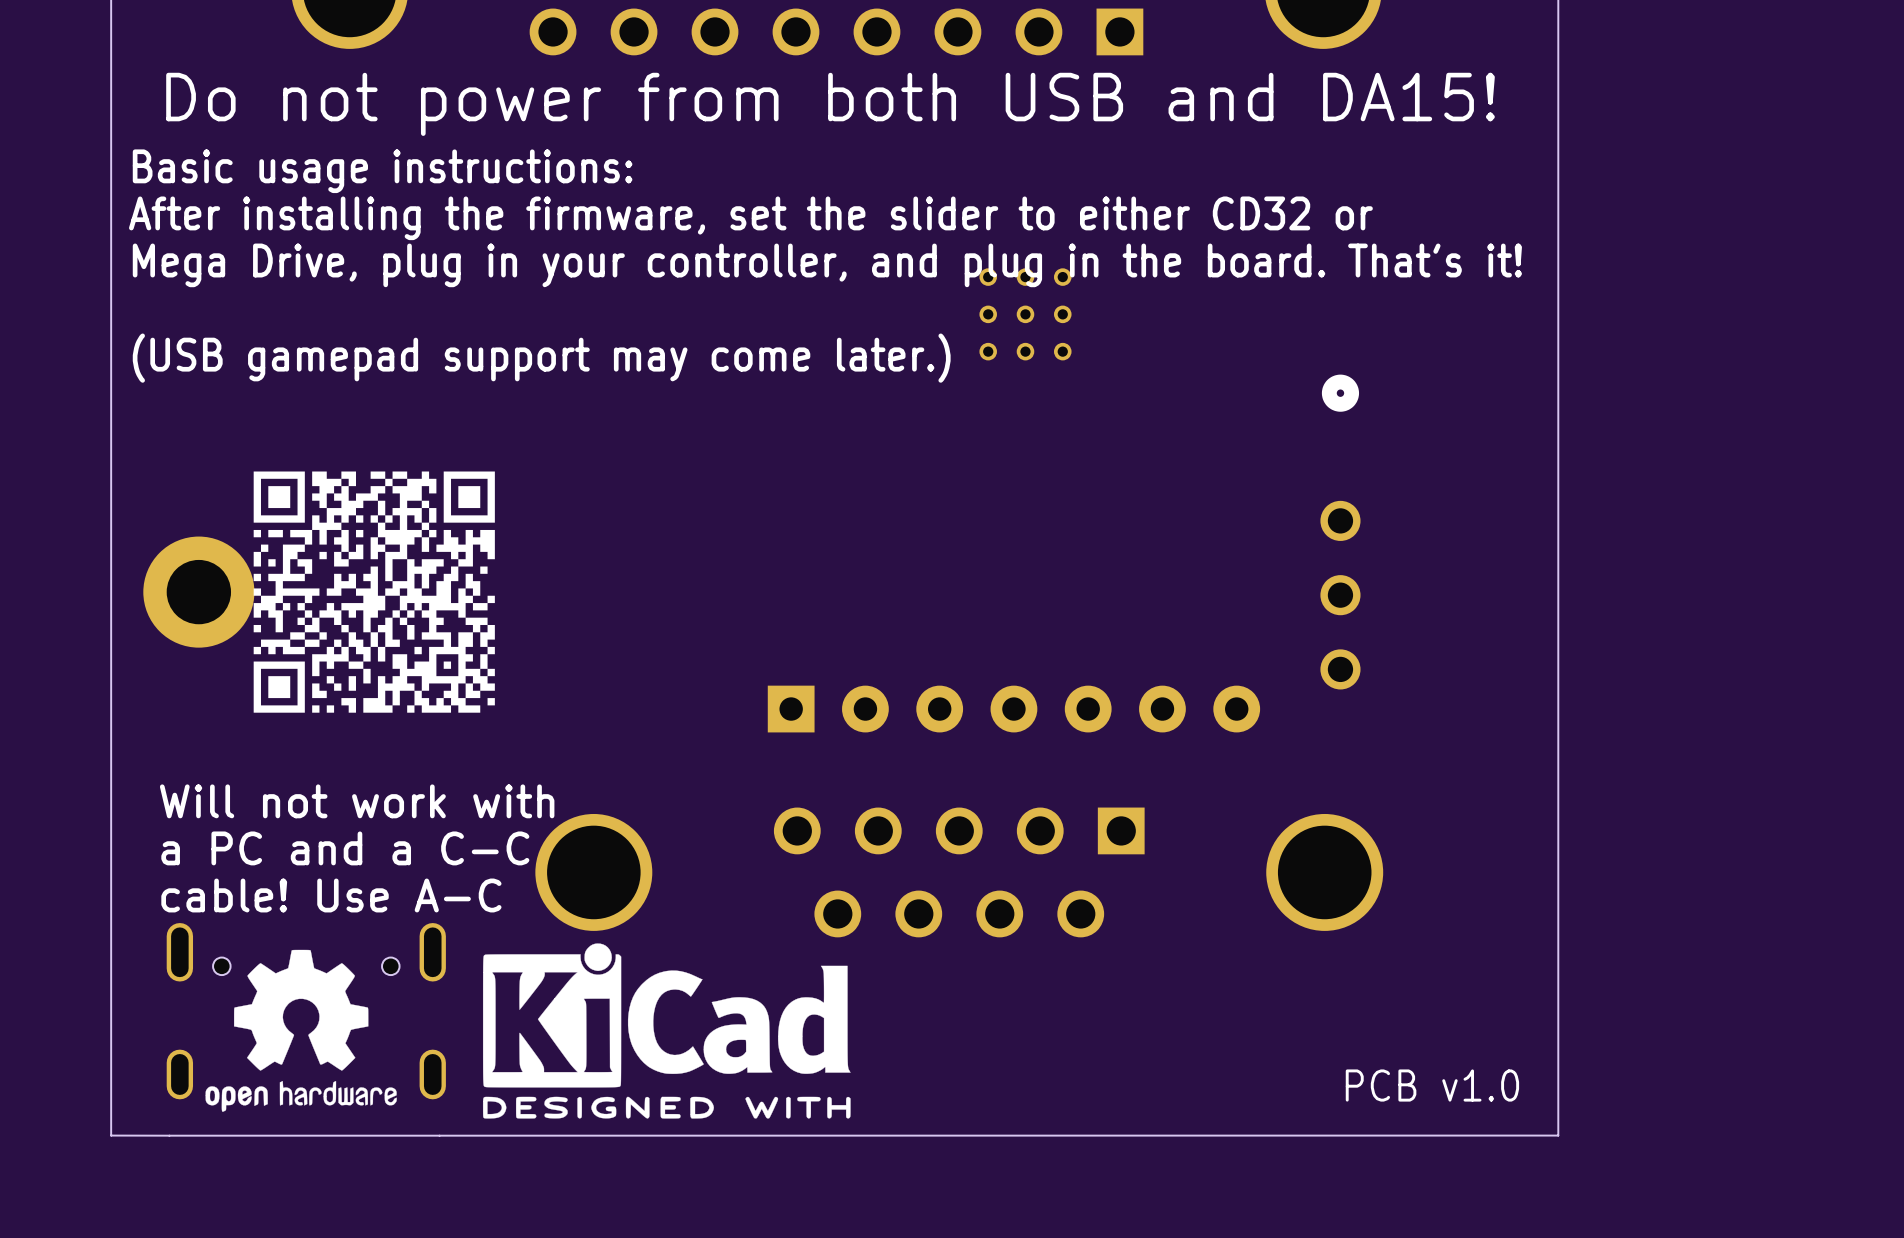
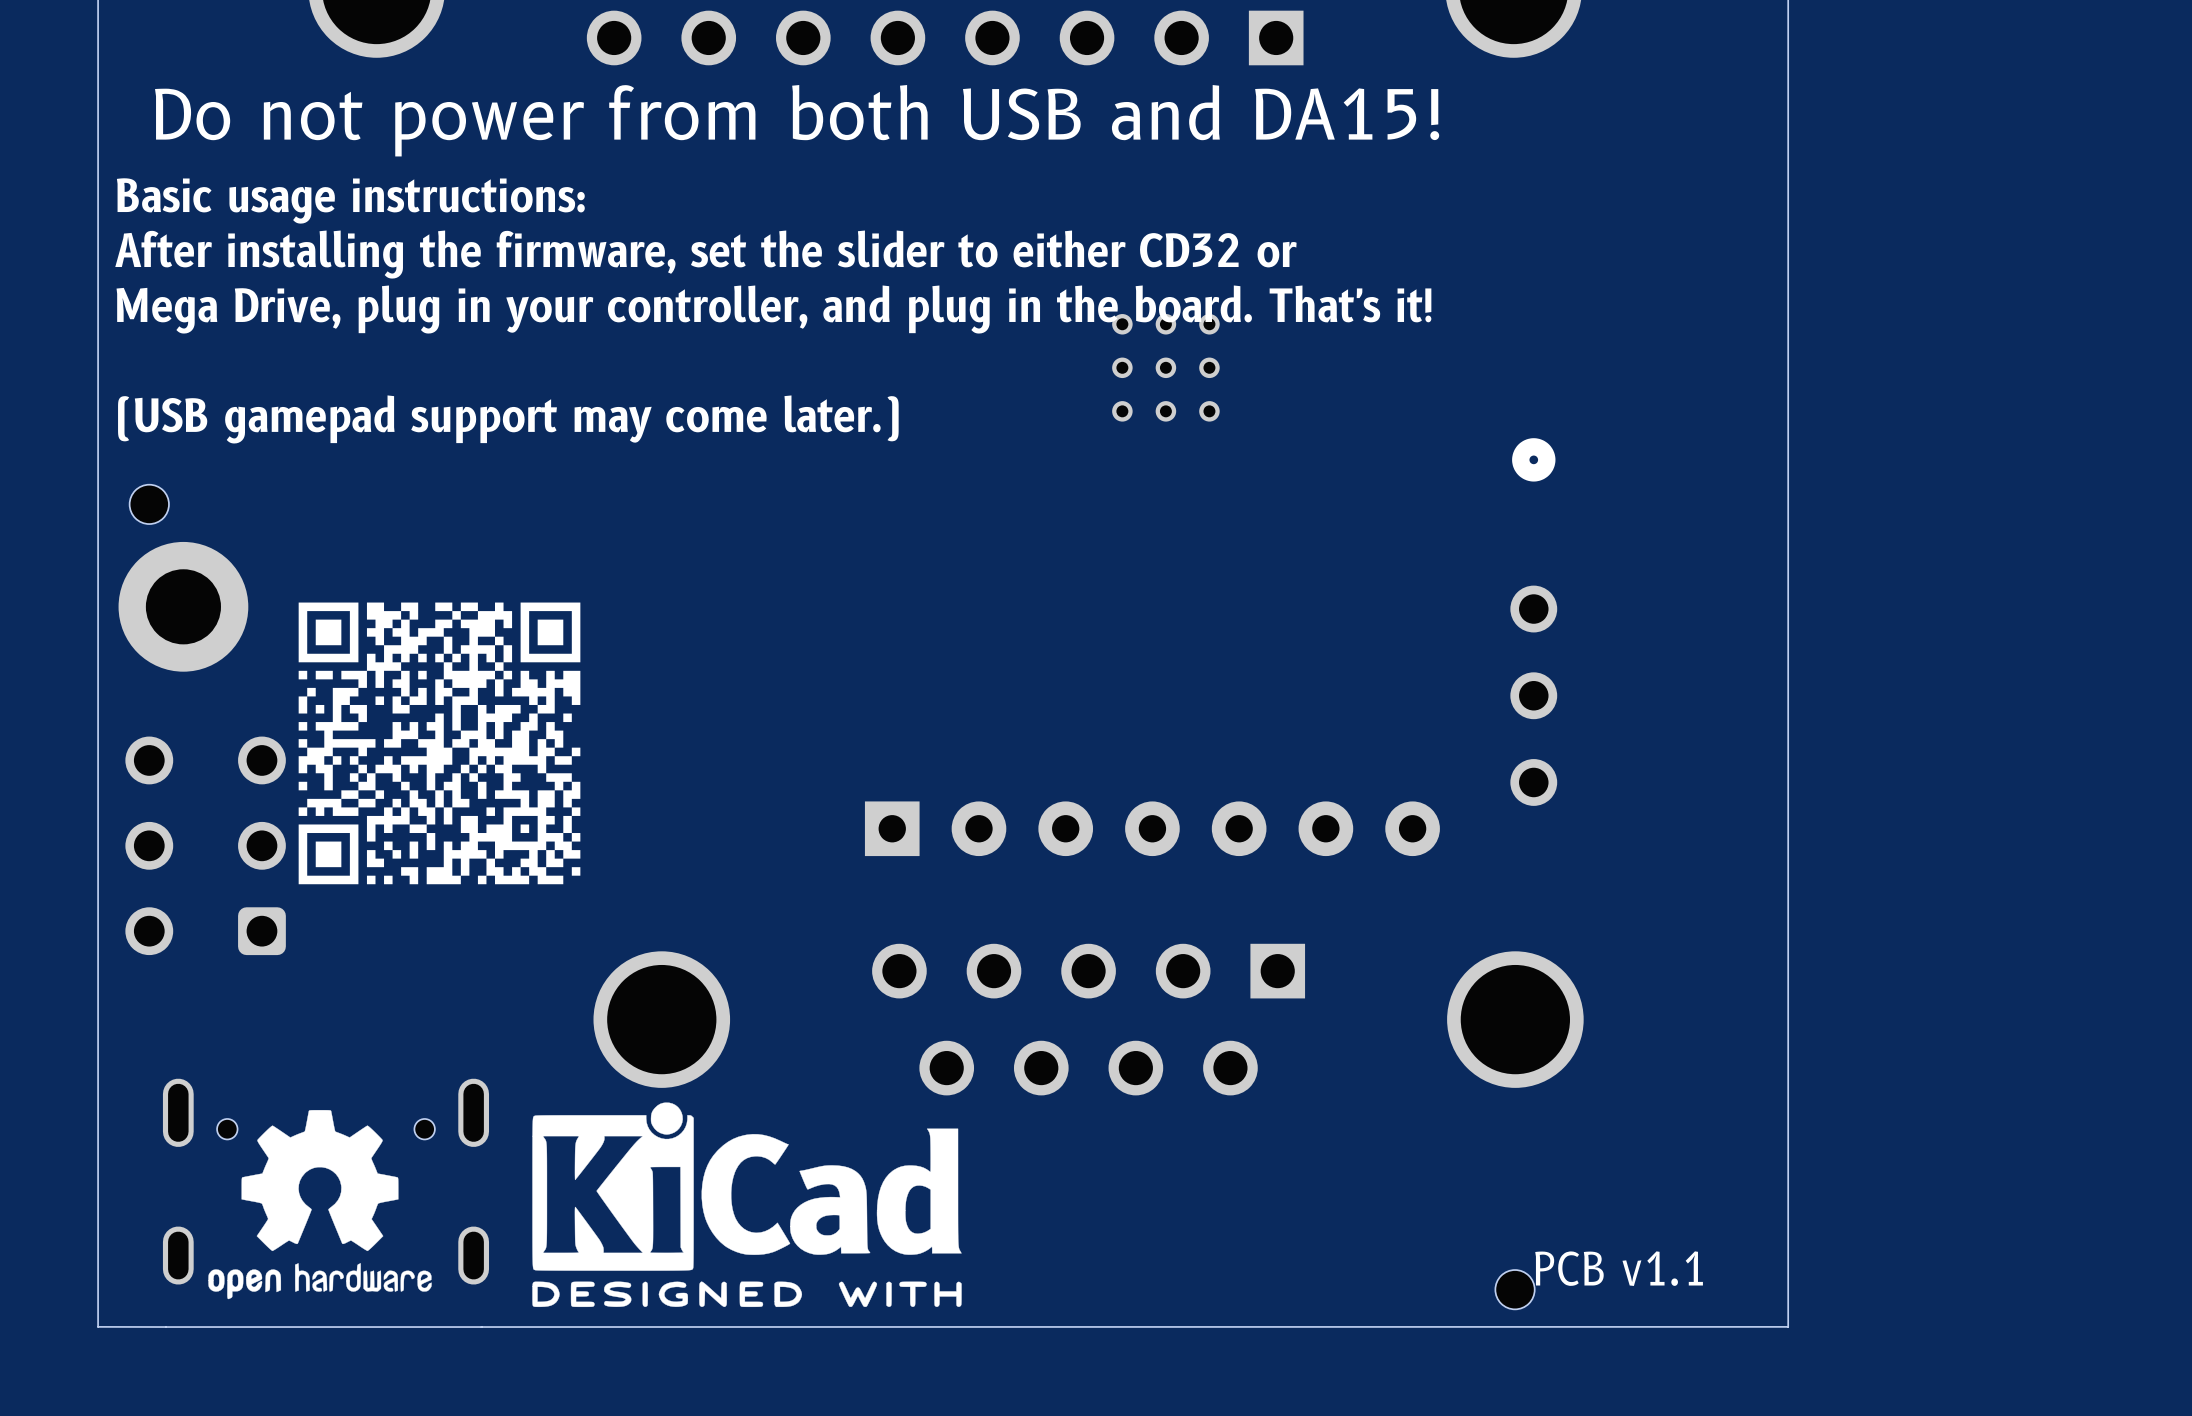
part: none -> (149, 504)
part position: (198, 592) -> (183, 606)
drawing position: (374, 592) -> (439, 743)
part: none -> (205, 845)
text: Will not work with (357, 801) -> none
text: a PC and a C-C (345, 848) -> none
text: cable! Use A-C (331, 895) -> none
text: PCB v1.0 (1432, 1085) -> PCB v1.1 (1619, 1268)
part: none -> (1515, 1289)

